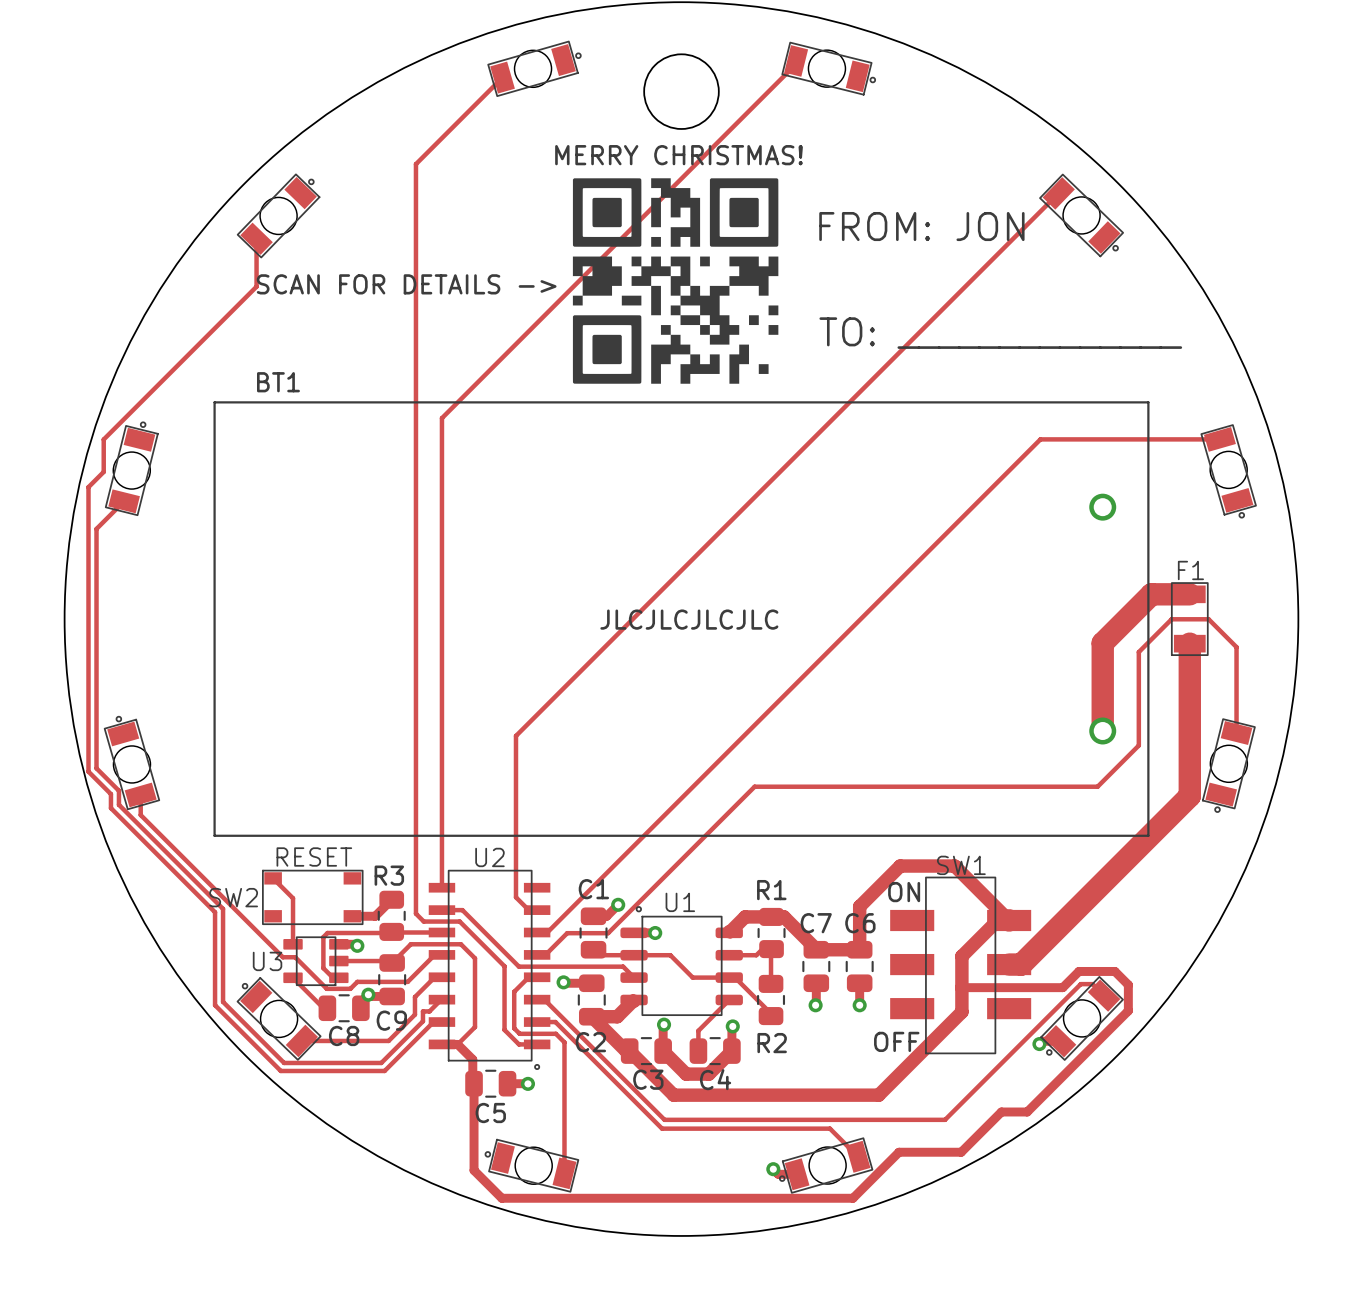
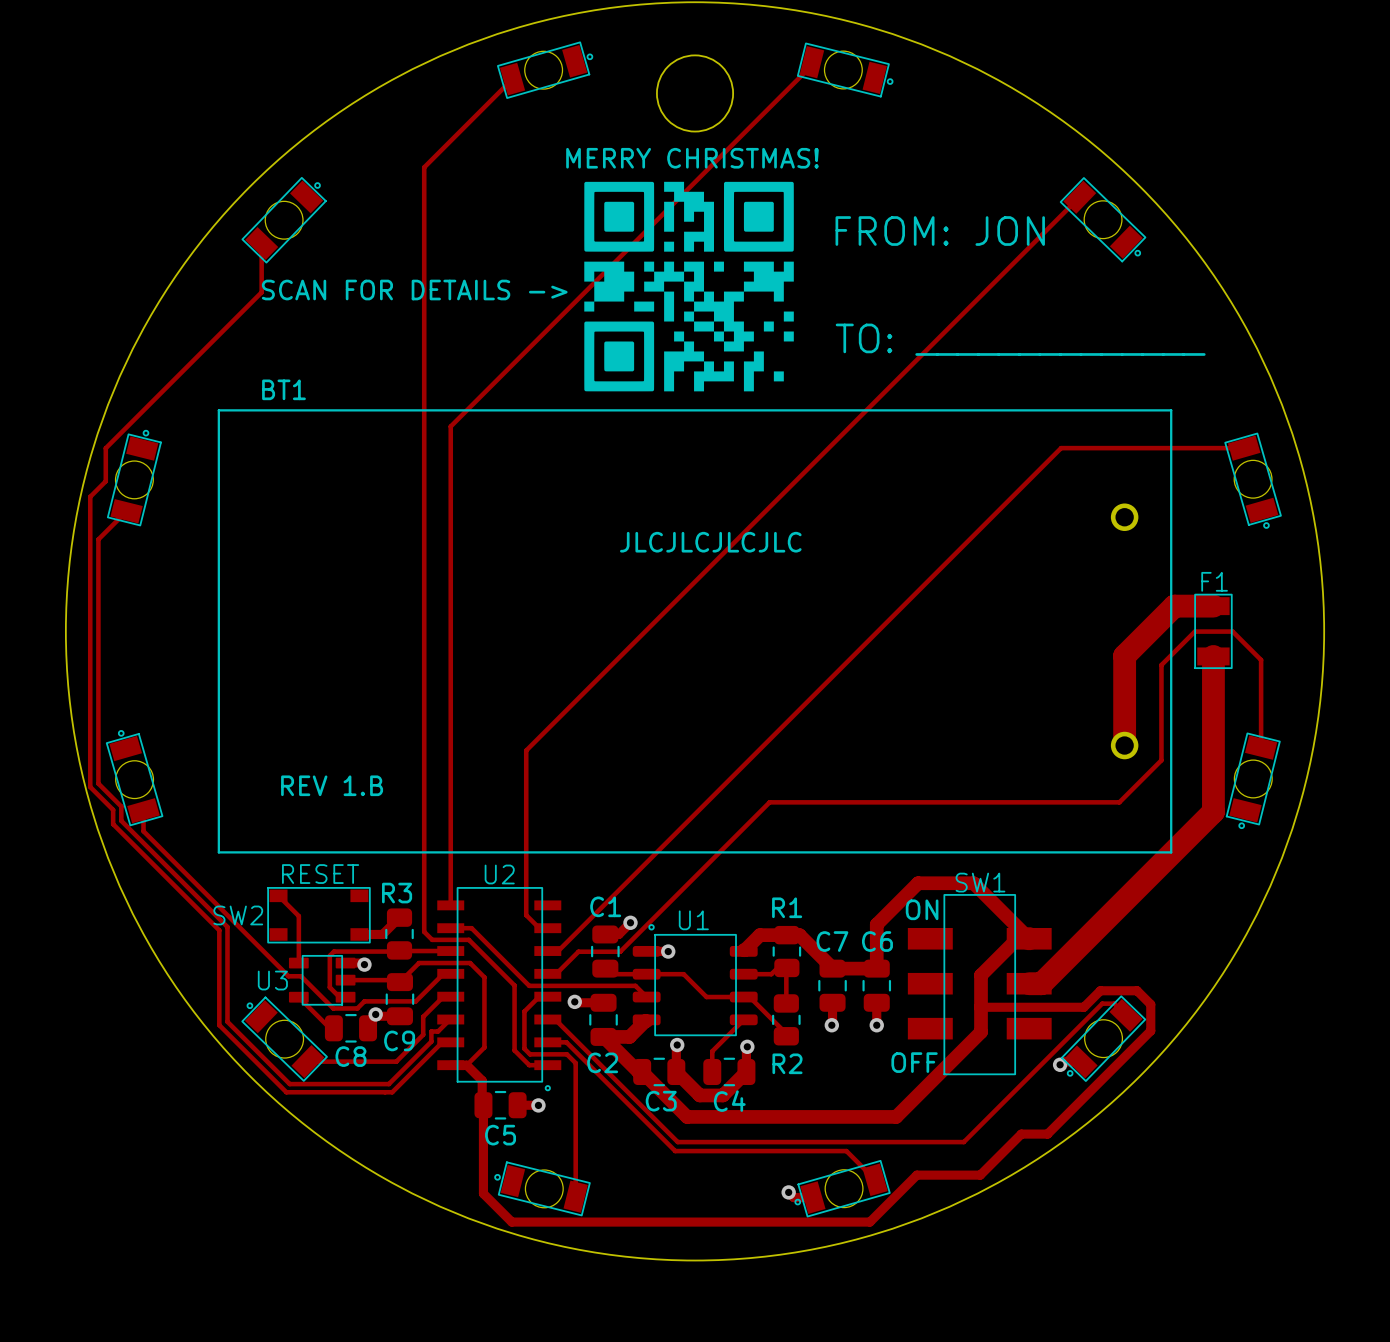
text position: JLCJLCJLCJLC (689, 619) -> JLCJLCJLCJLC (710, 542)
text: none -> REV 1.B (332, 785)

